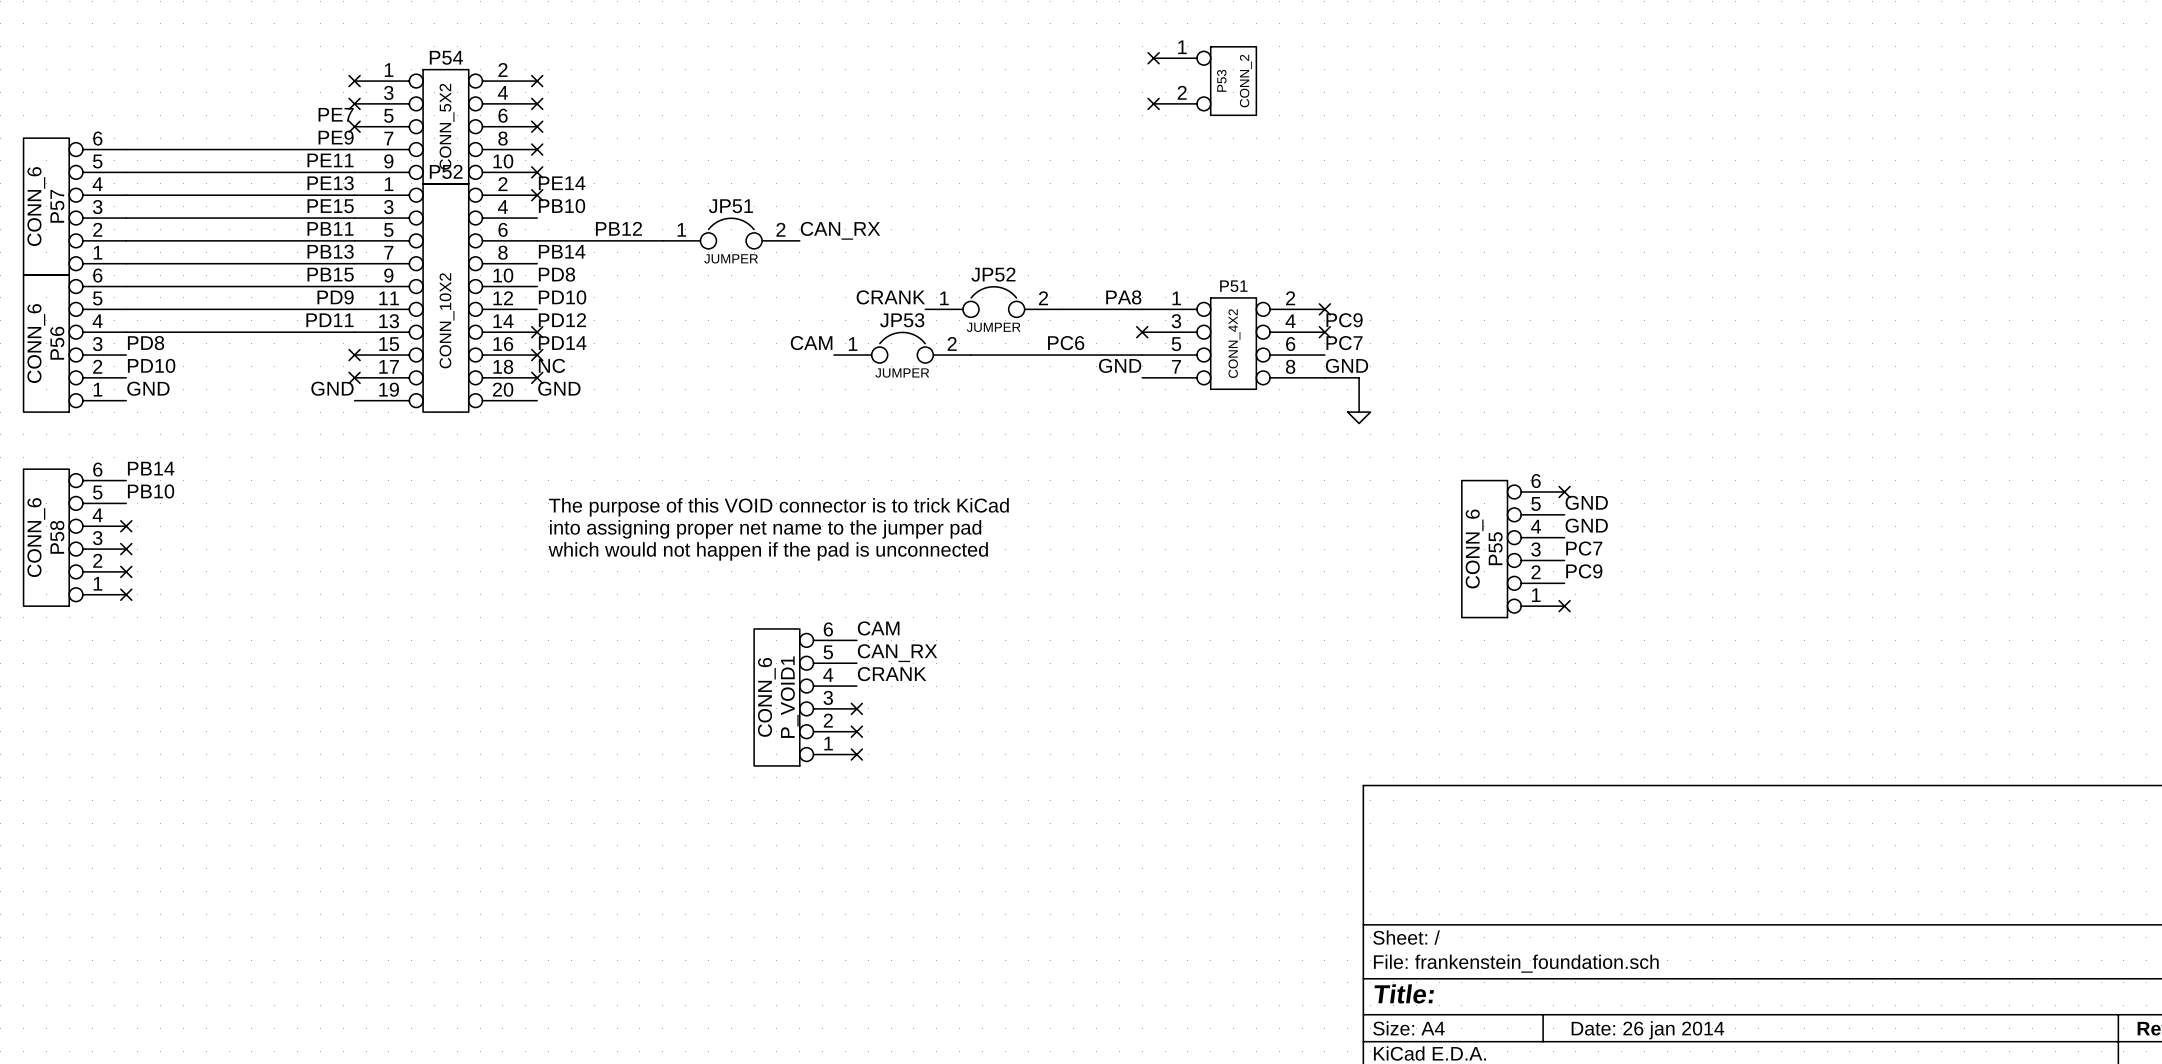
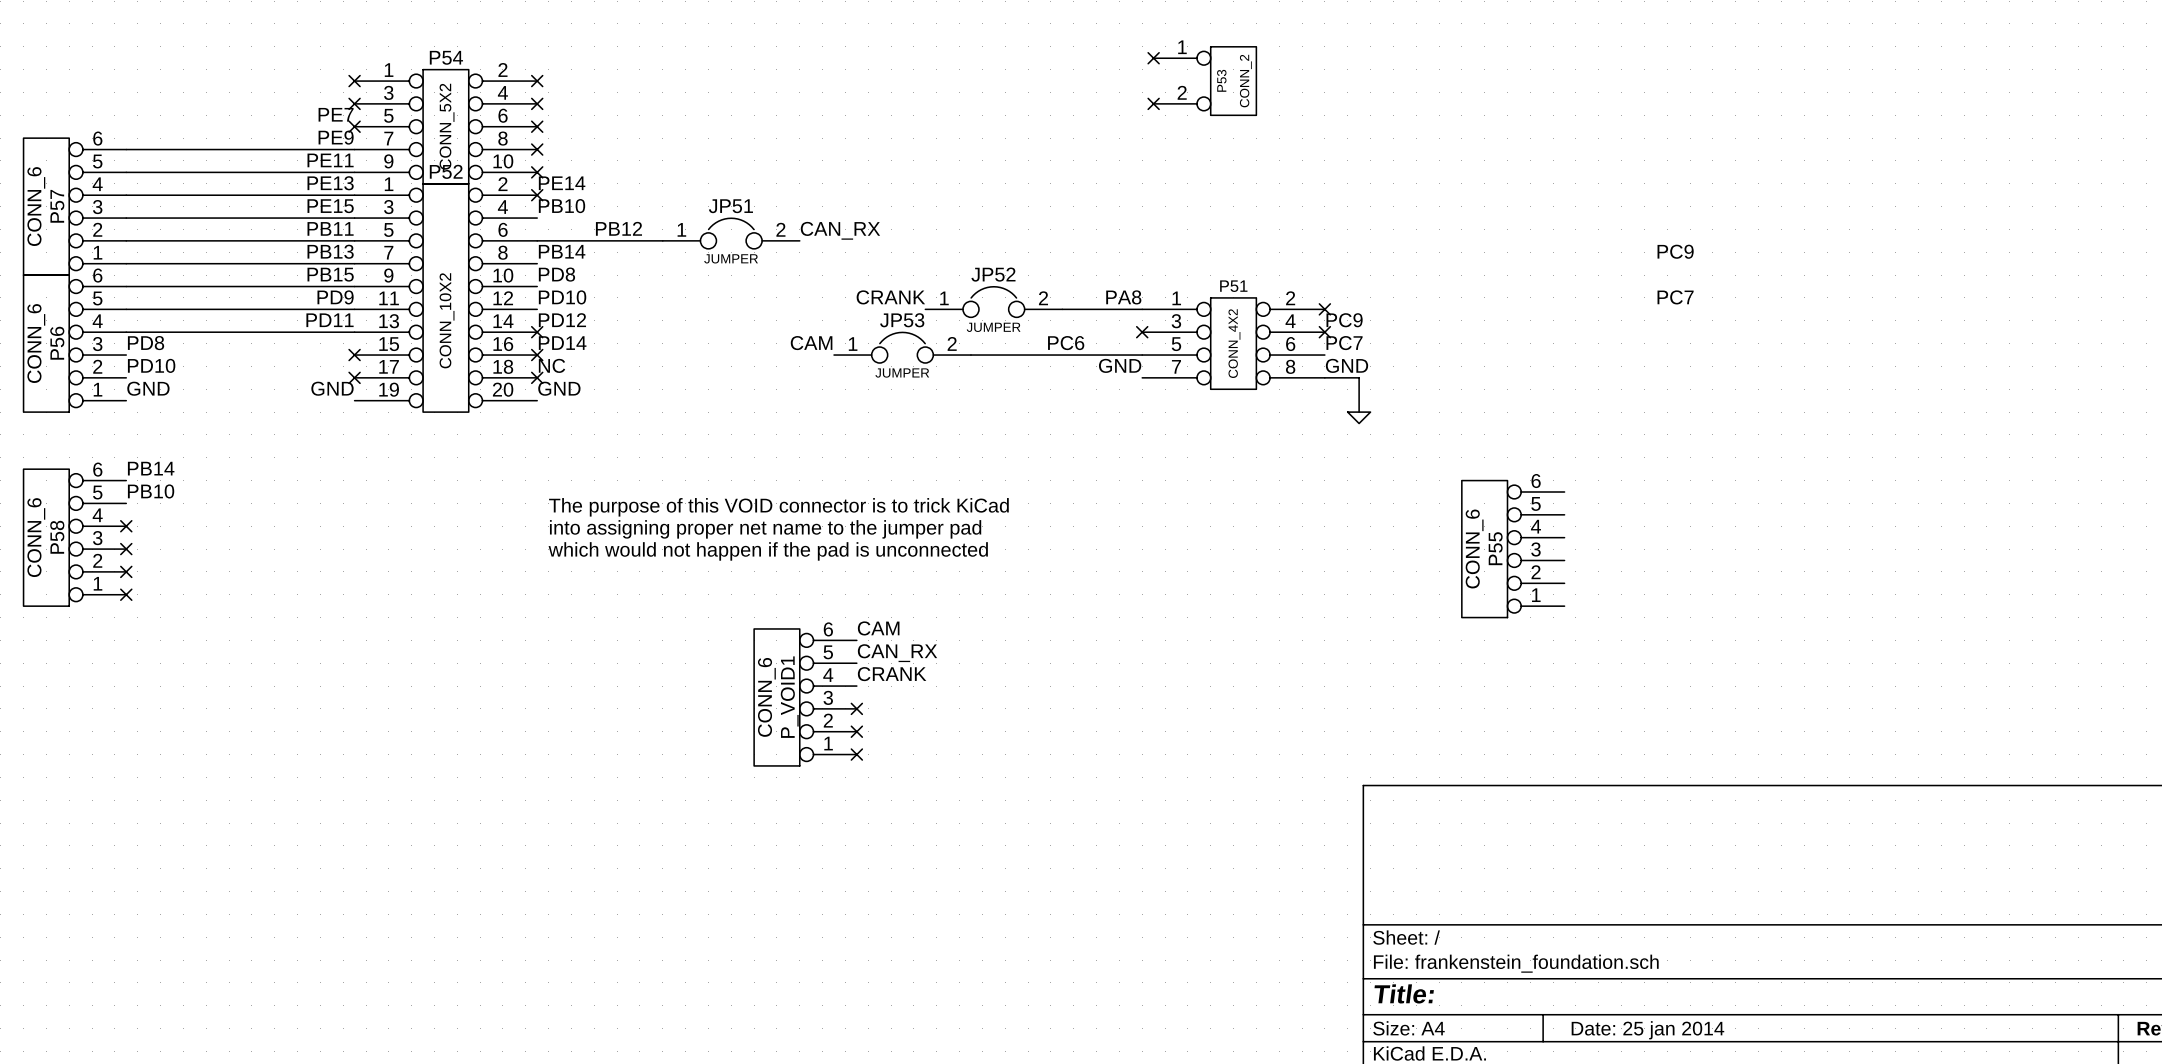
label: none -> PC9 (1675, 251)
label: none -> PC7 (1675, 297)
no-connect mark: (1564, 492) -> none
label: GND (1586, 502) -> none
label: GND (1586, 525) -> none
label: PC7 (1584, 548) -> none
label: PC9 (1584, 571) -> none
no-connect mark: (1564, 606) -> none
title block: Date: 26 jan 2014 (1647, 1030) -> Date: 25 jan 2014 (1647, 1030)

